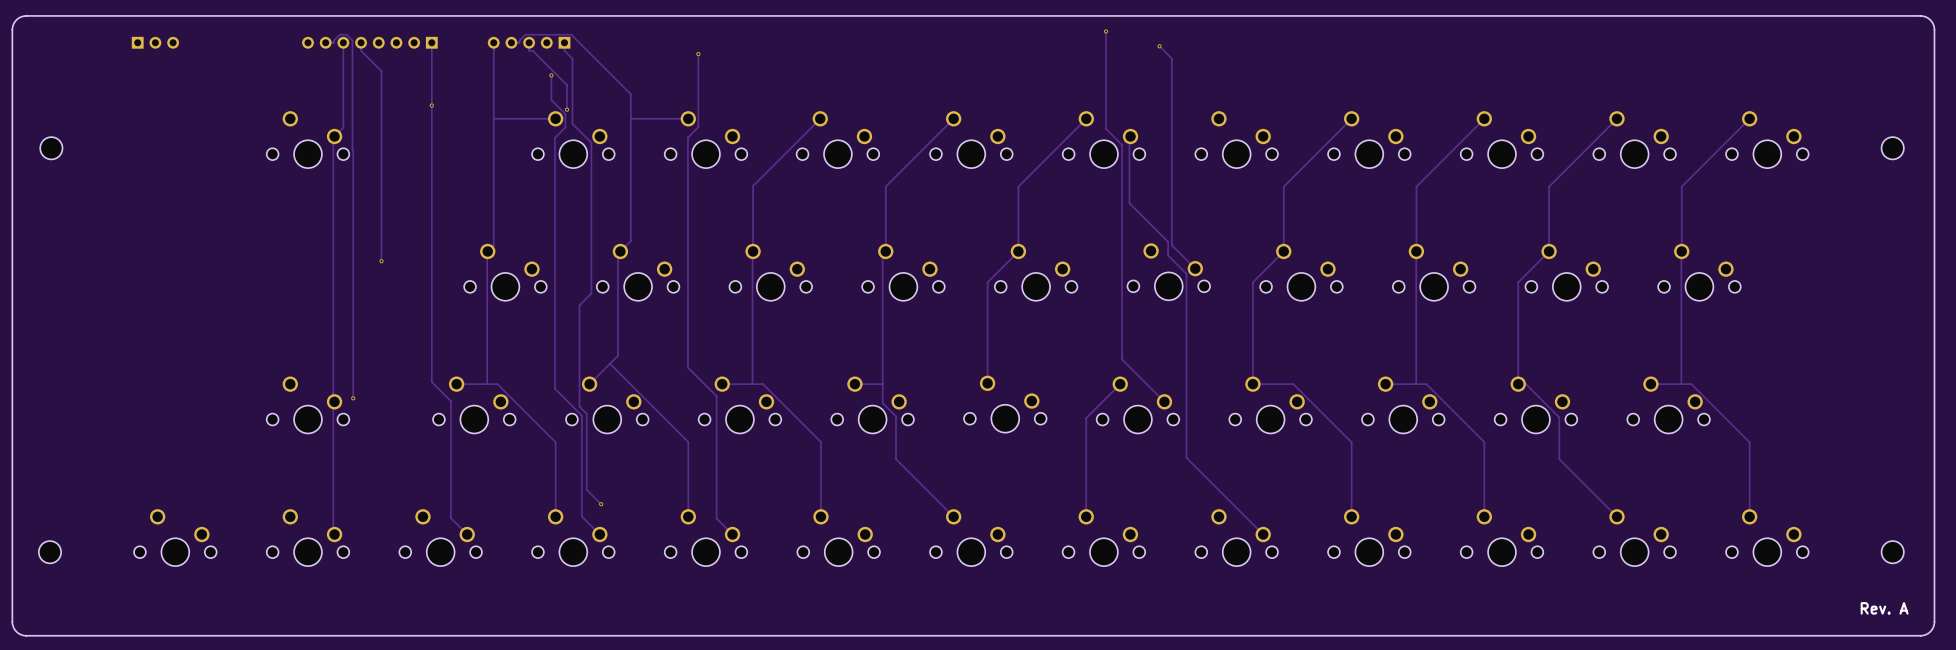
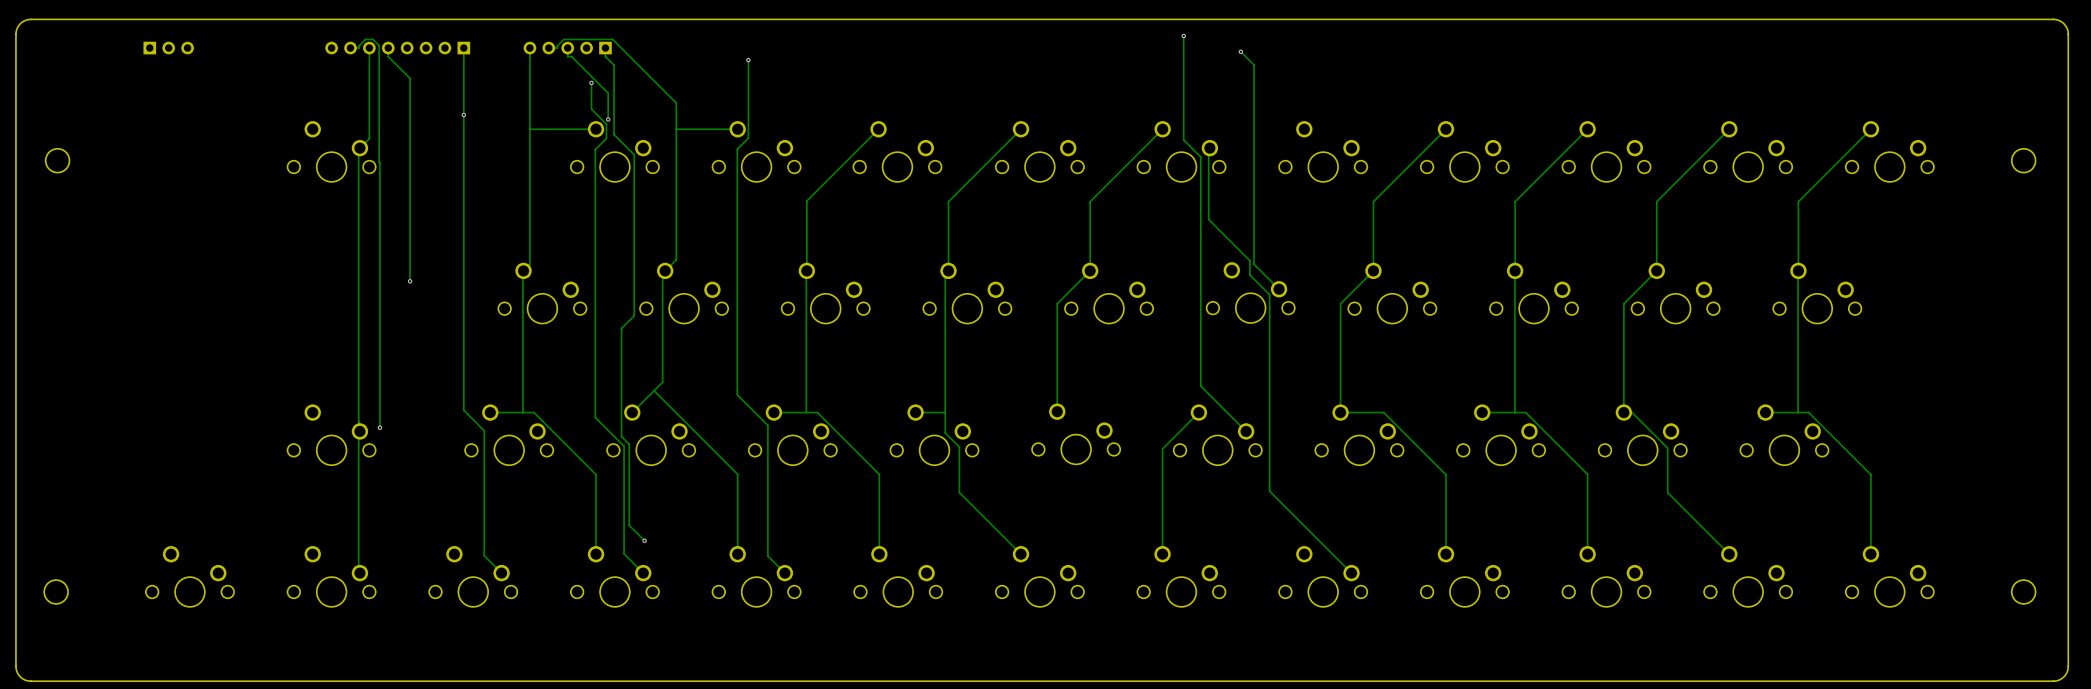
text: Rev. A (1884, 608) -> none

